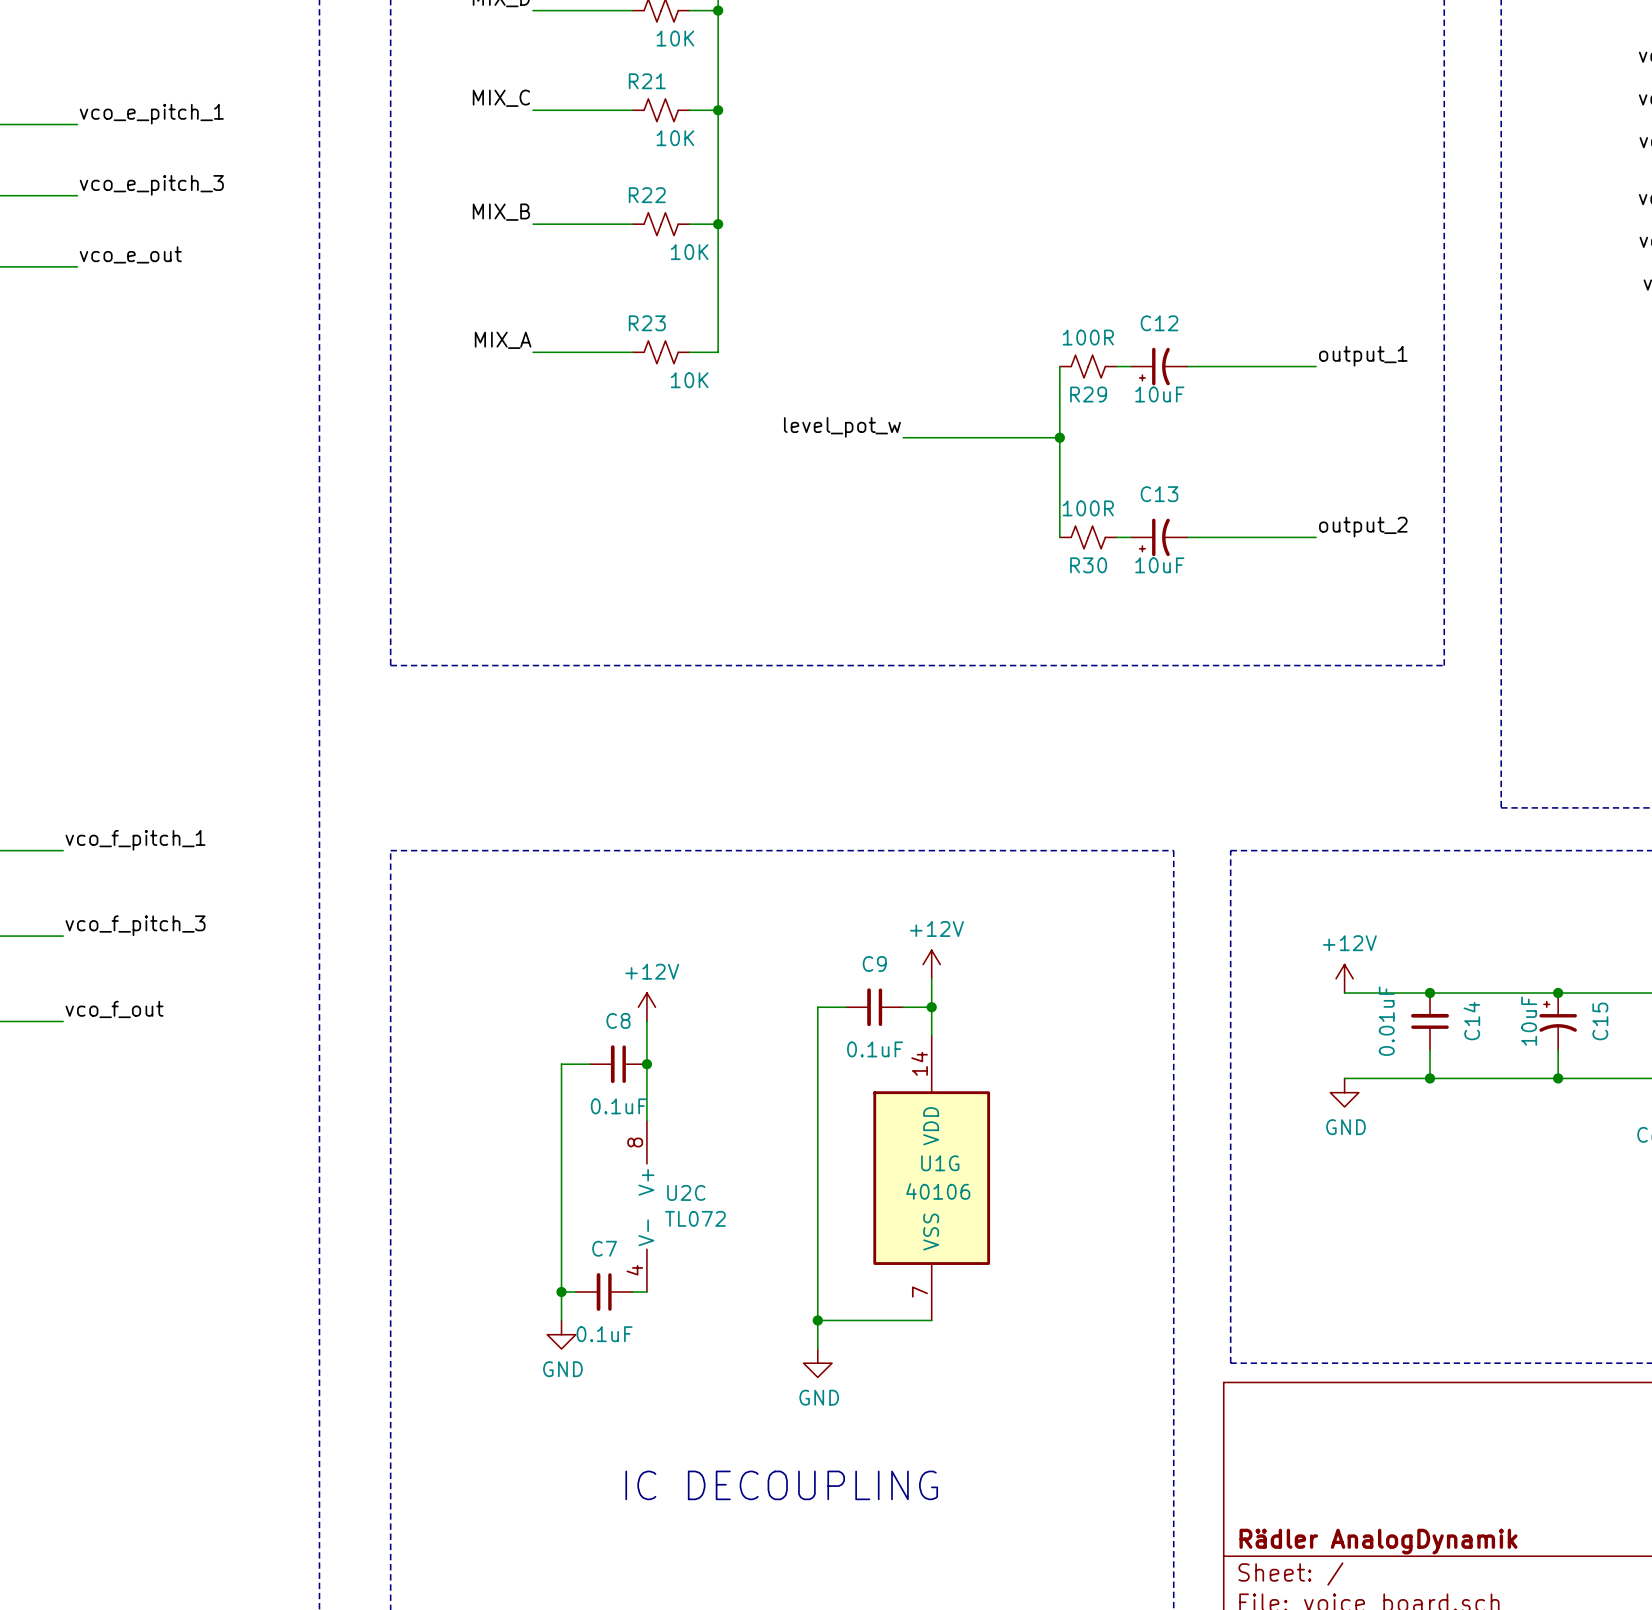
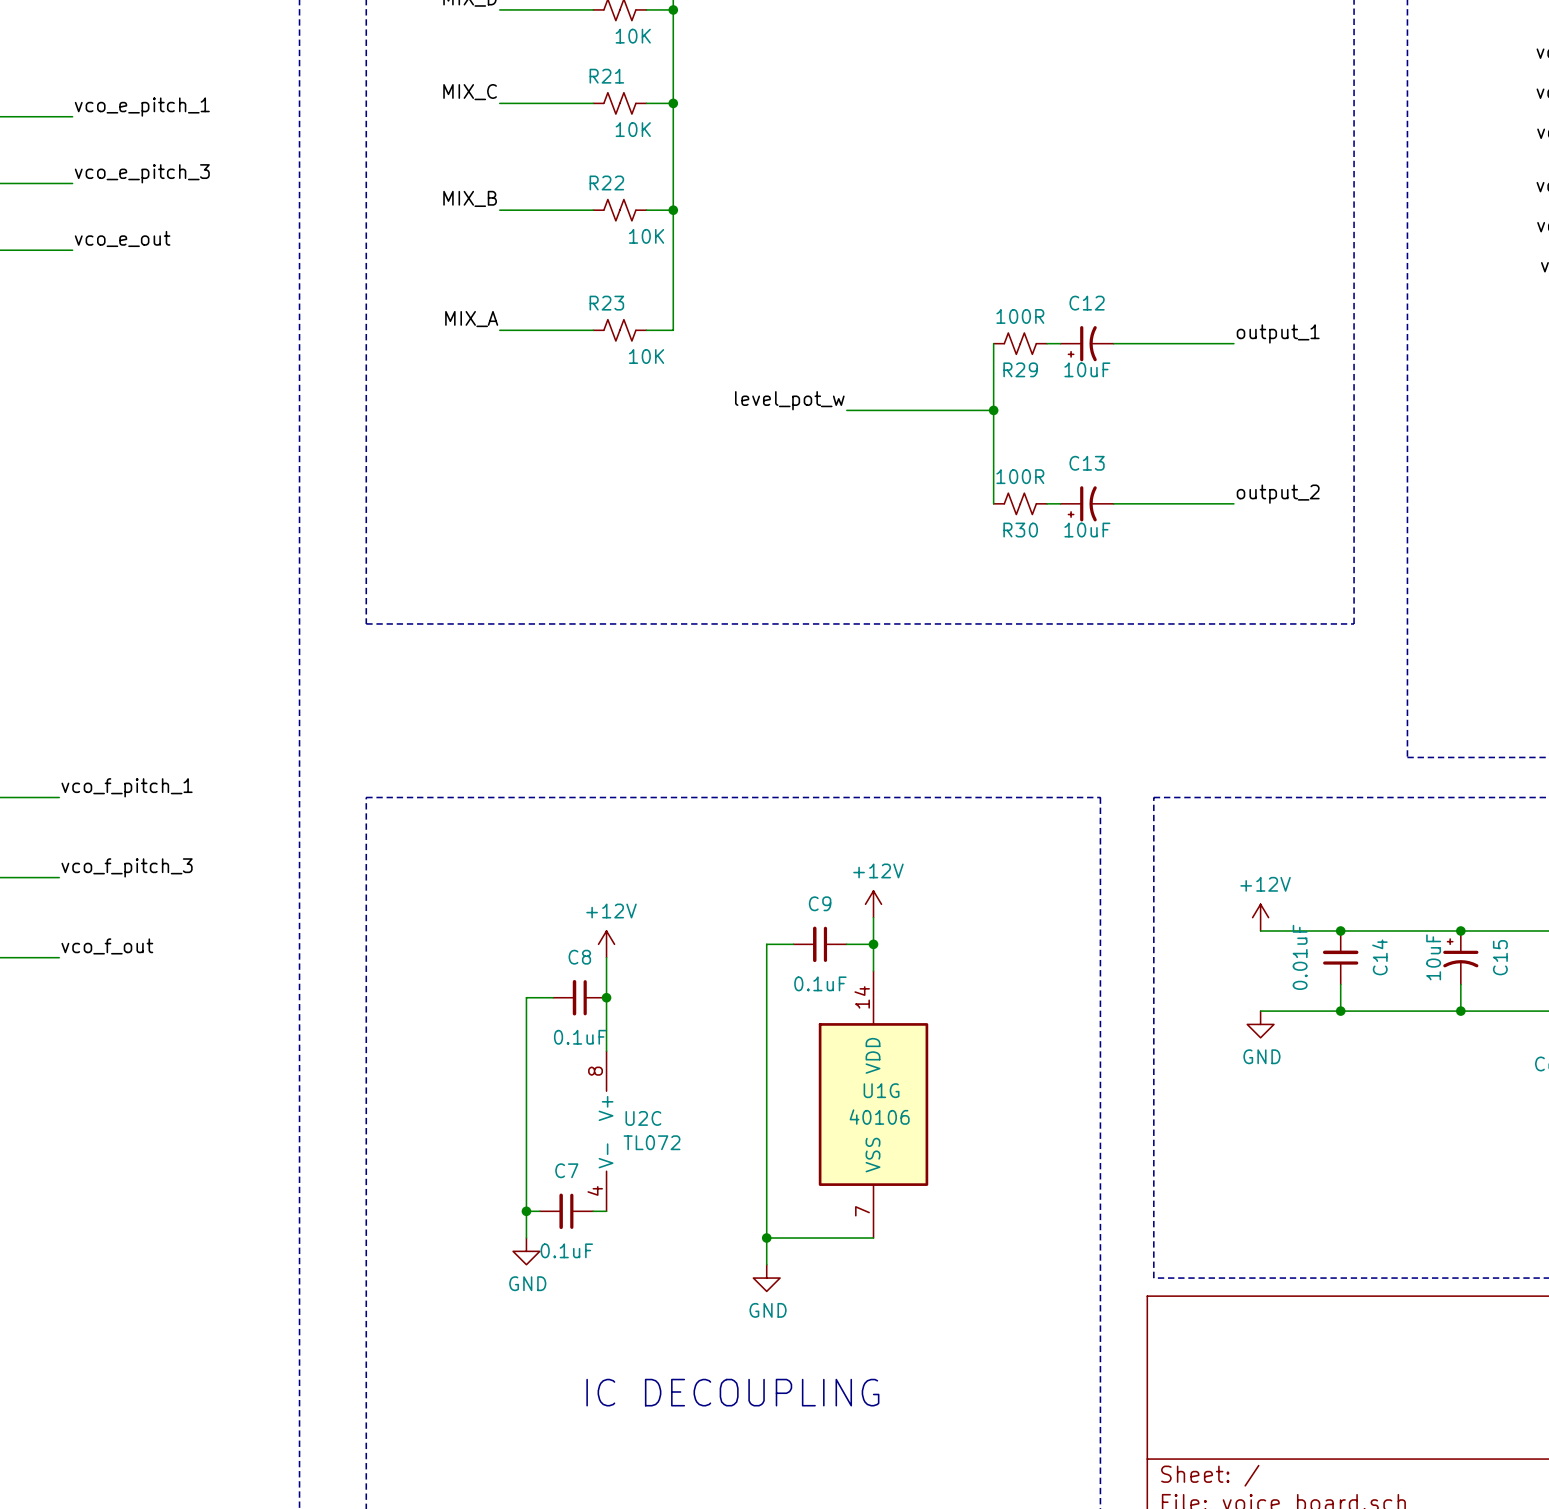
title block: Rädler AnalogDynamik (1378, 1541) -> none

